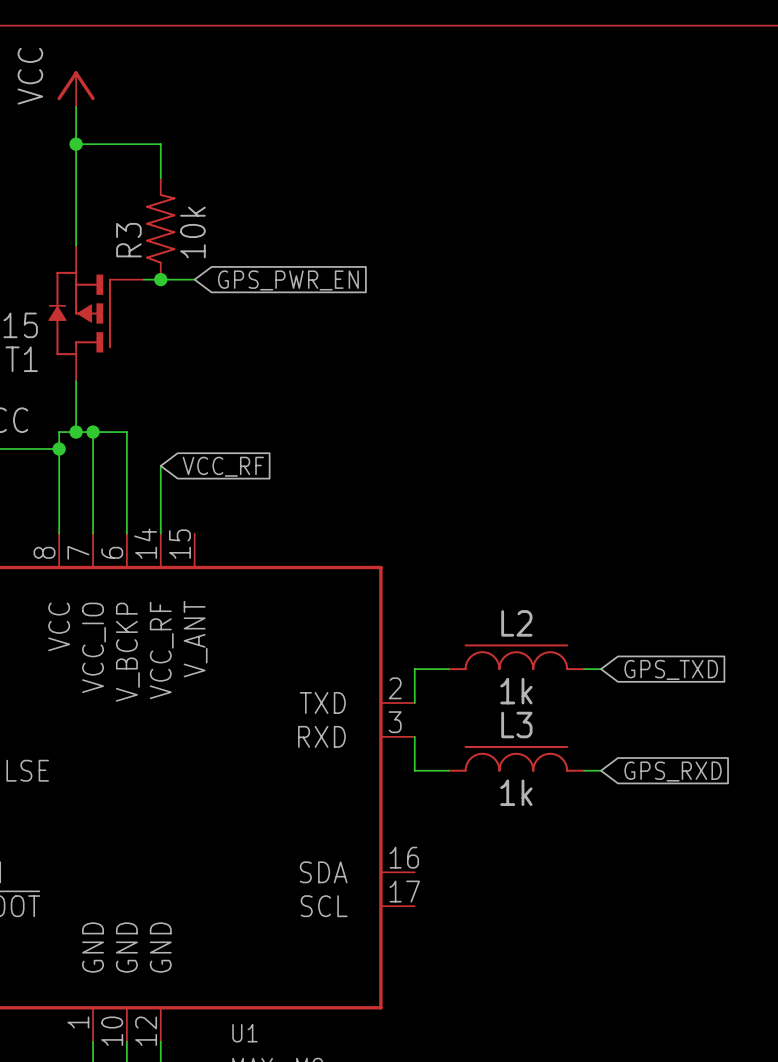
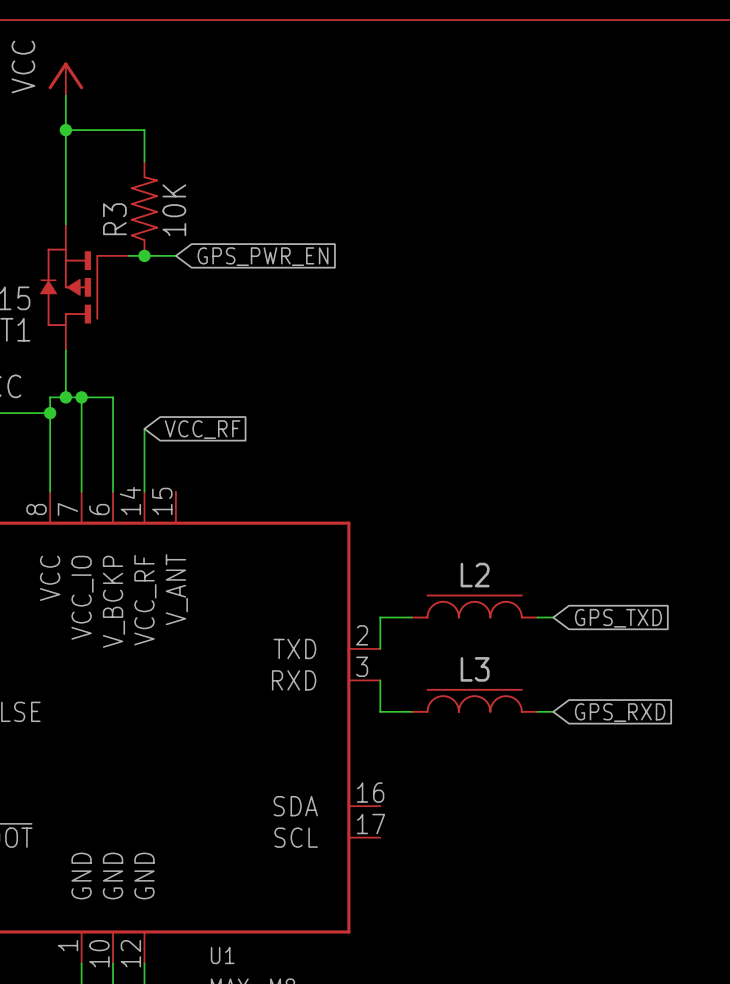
R3 value: 10k (192, 232) -> 10K (174, 210)
L2 value: 1k (516, 691) -> none
L3 value: 1k (516, 792) -> none

